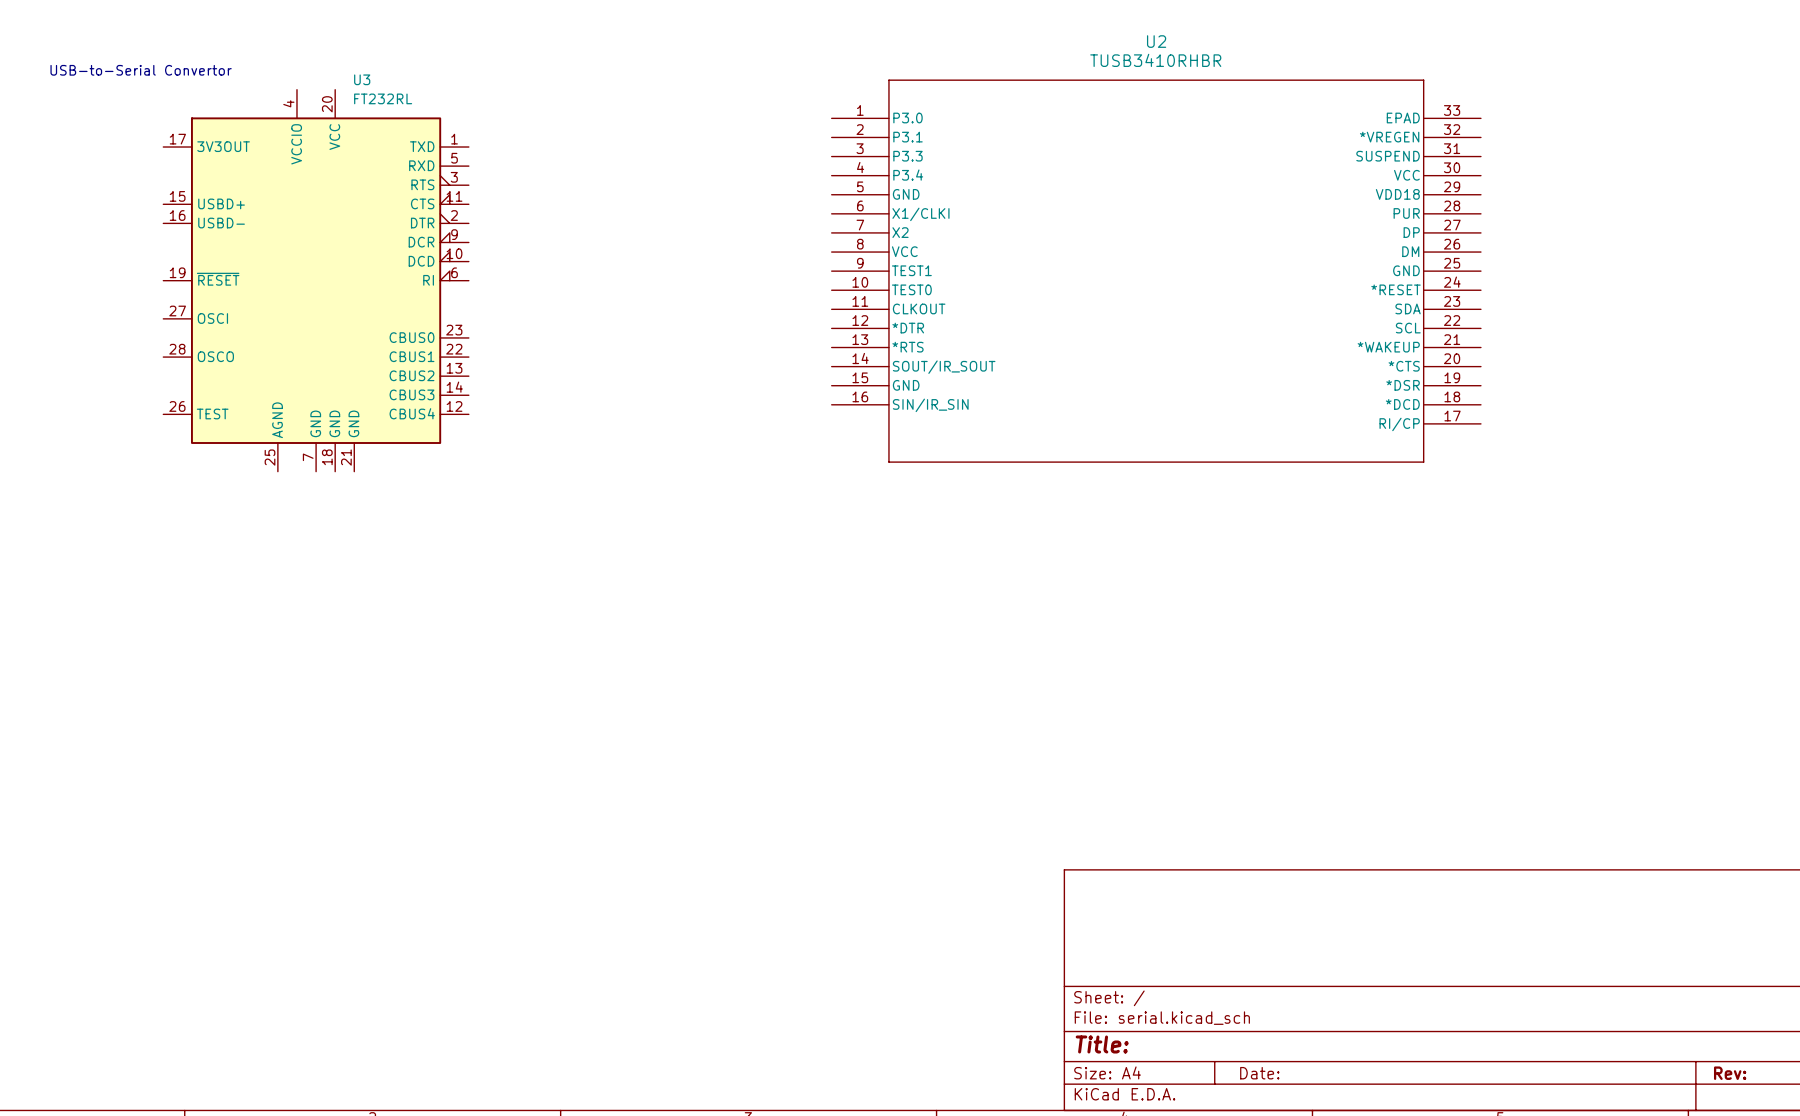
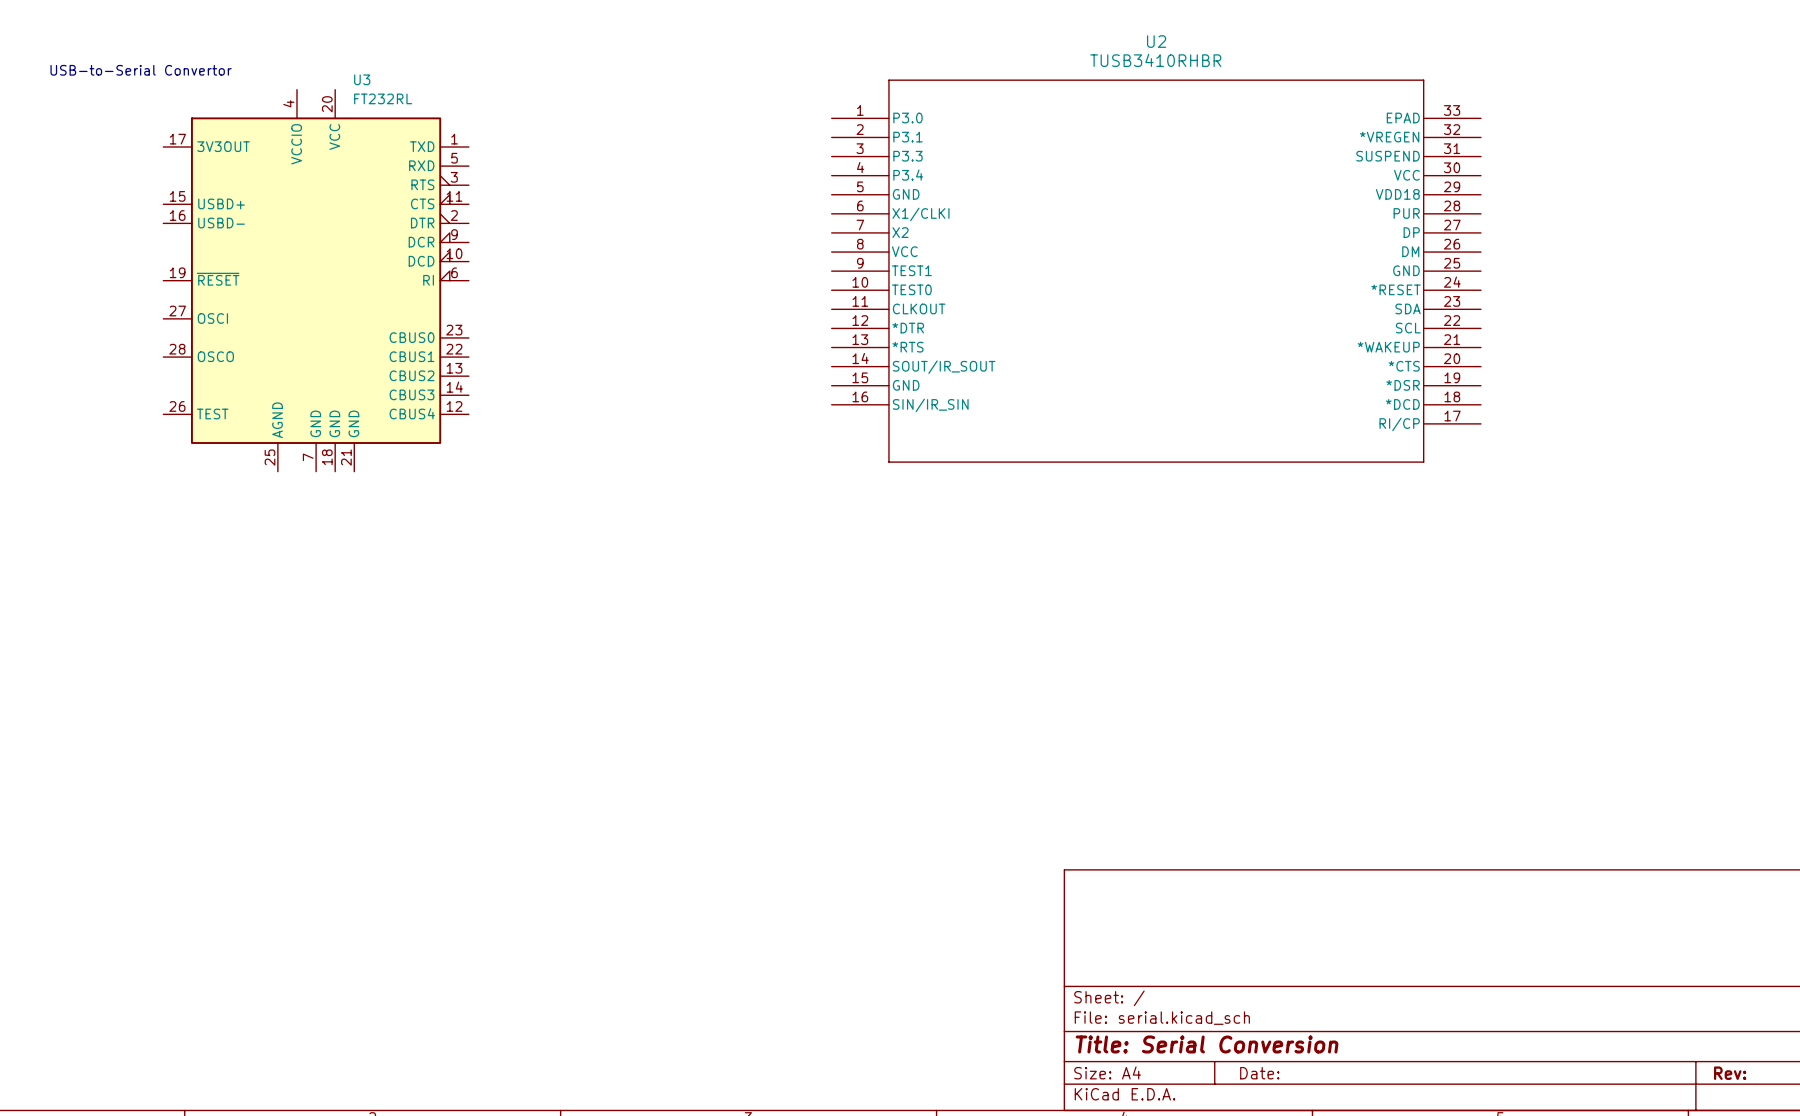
title block: Title: (1102, 1044) -> Title: Serial Conversion (1207, 1044)

